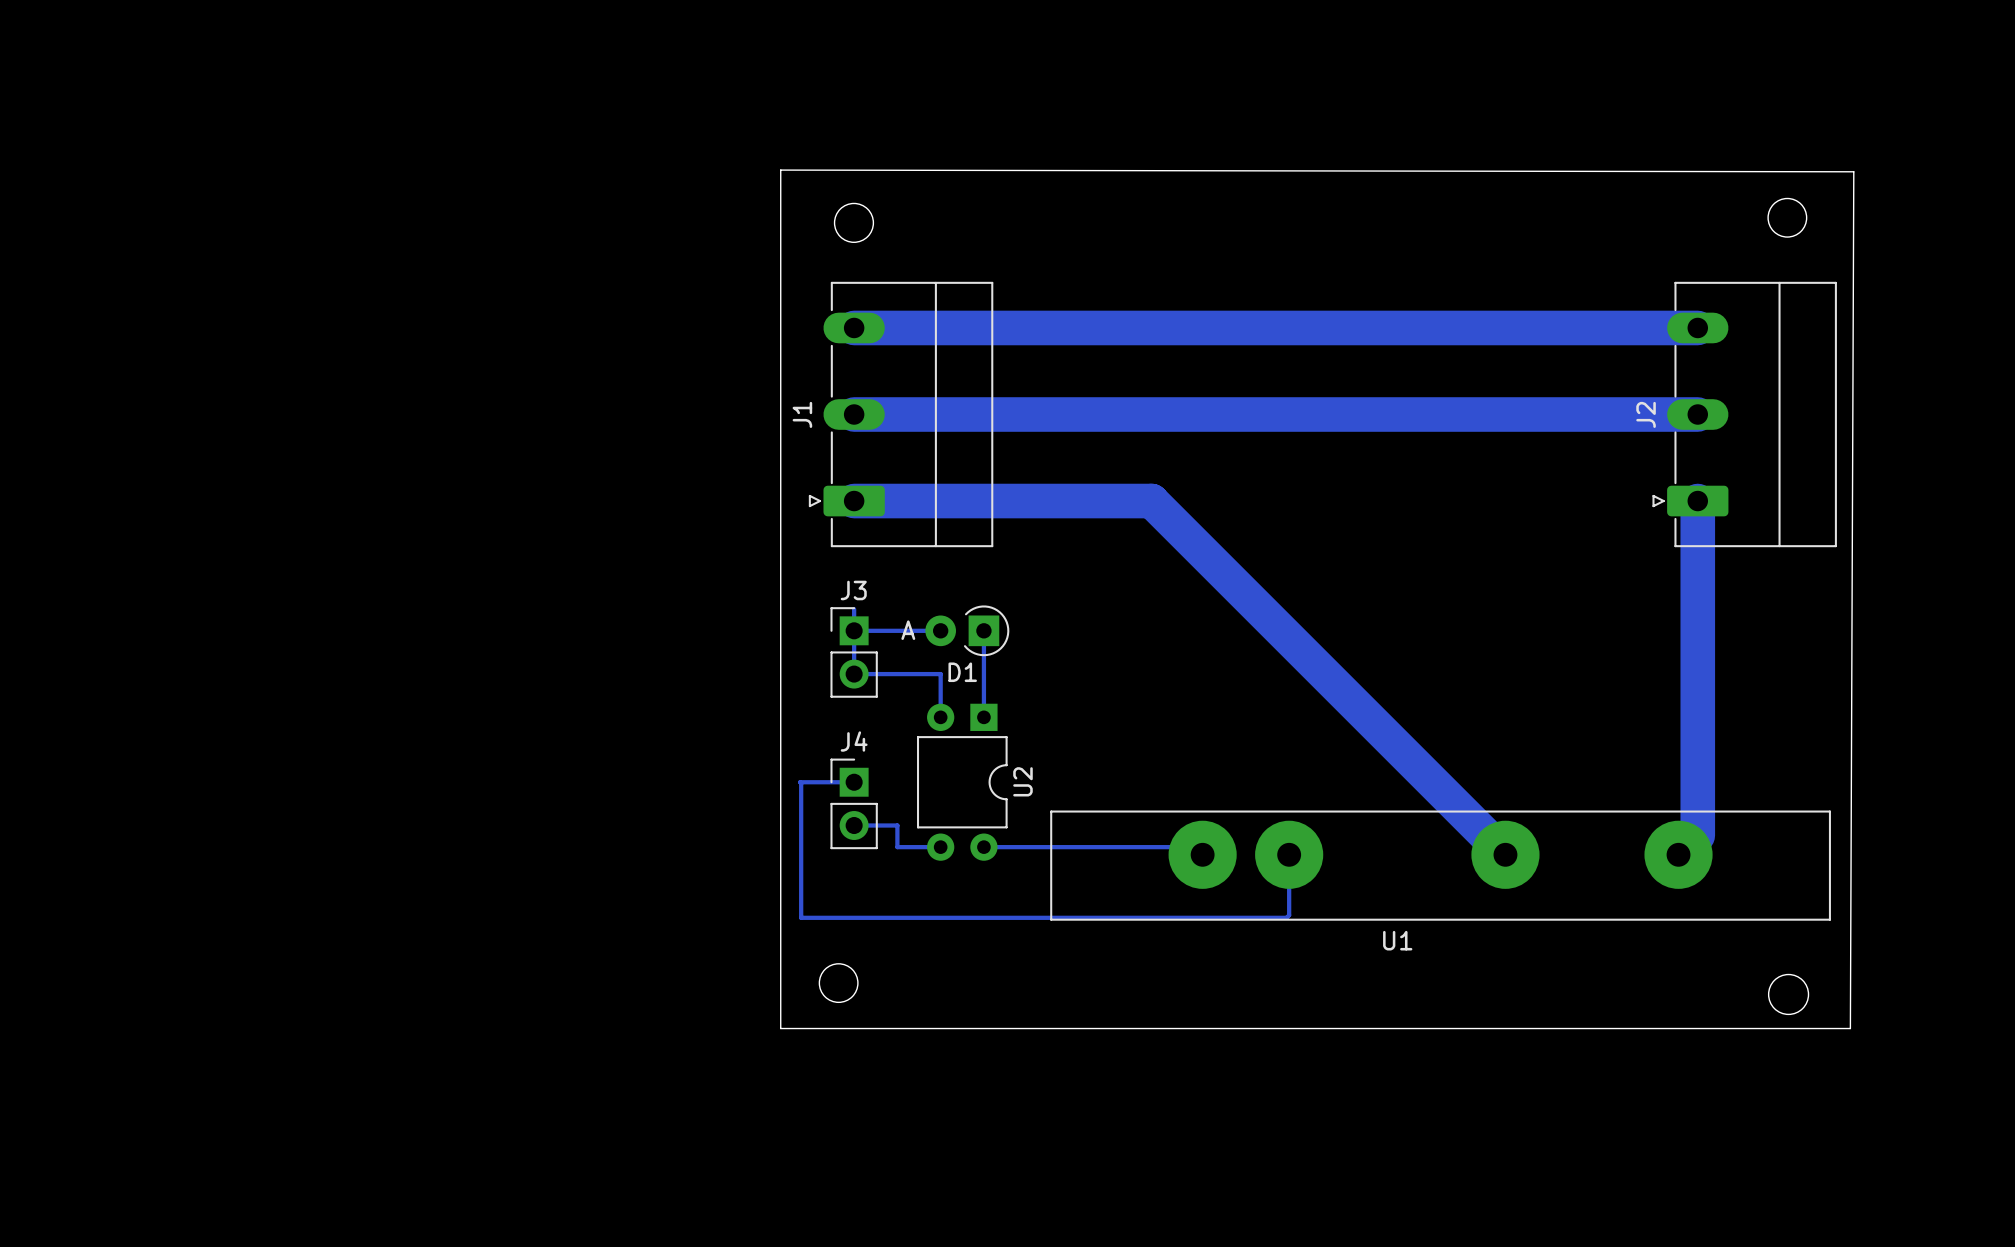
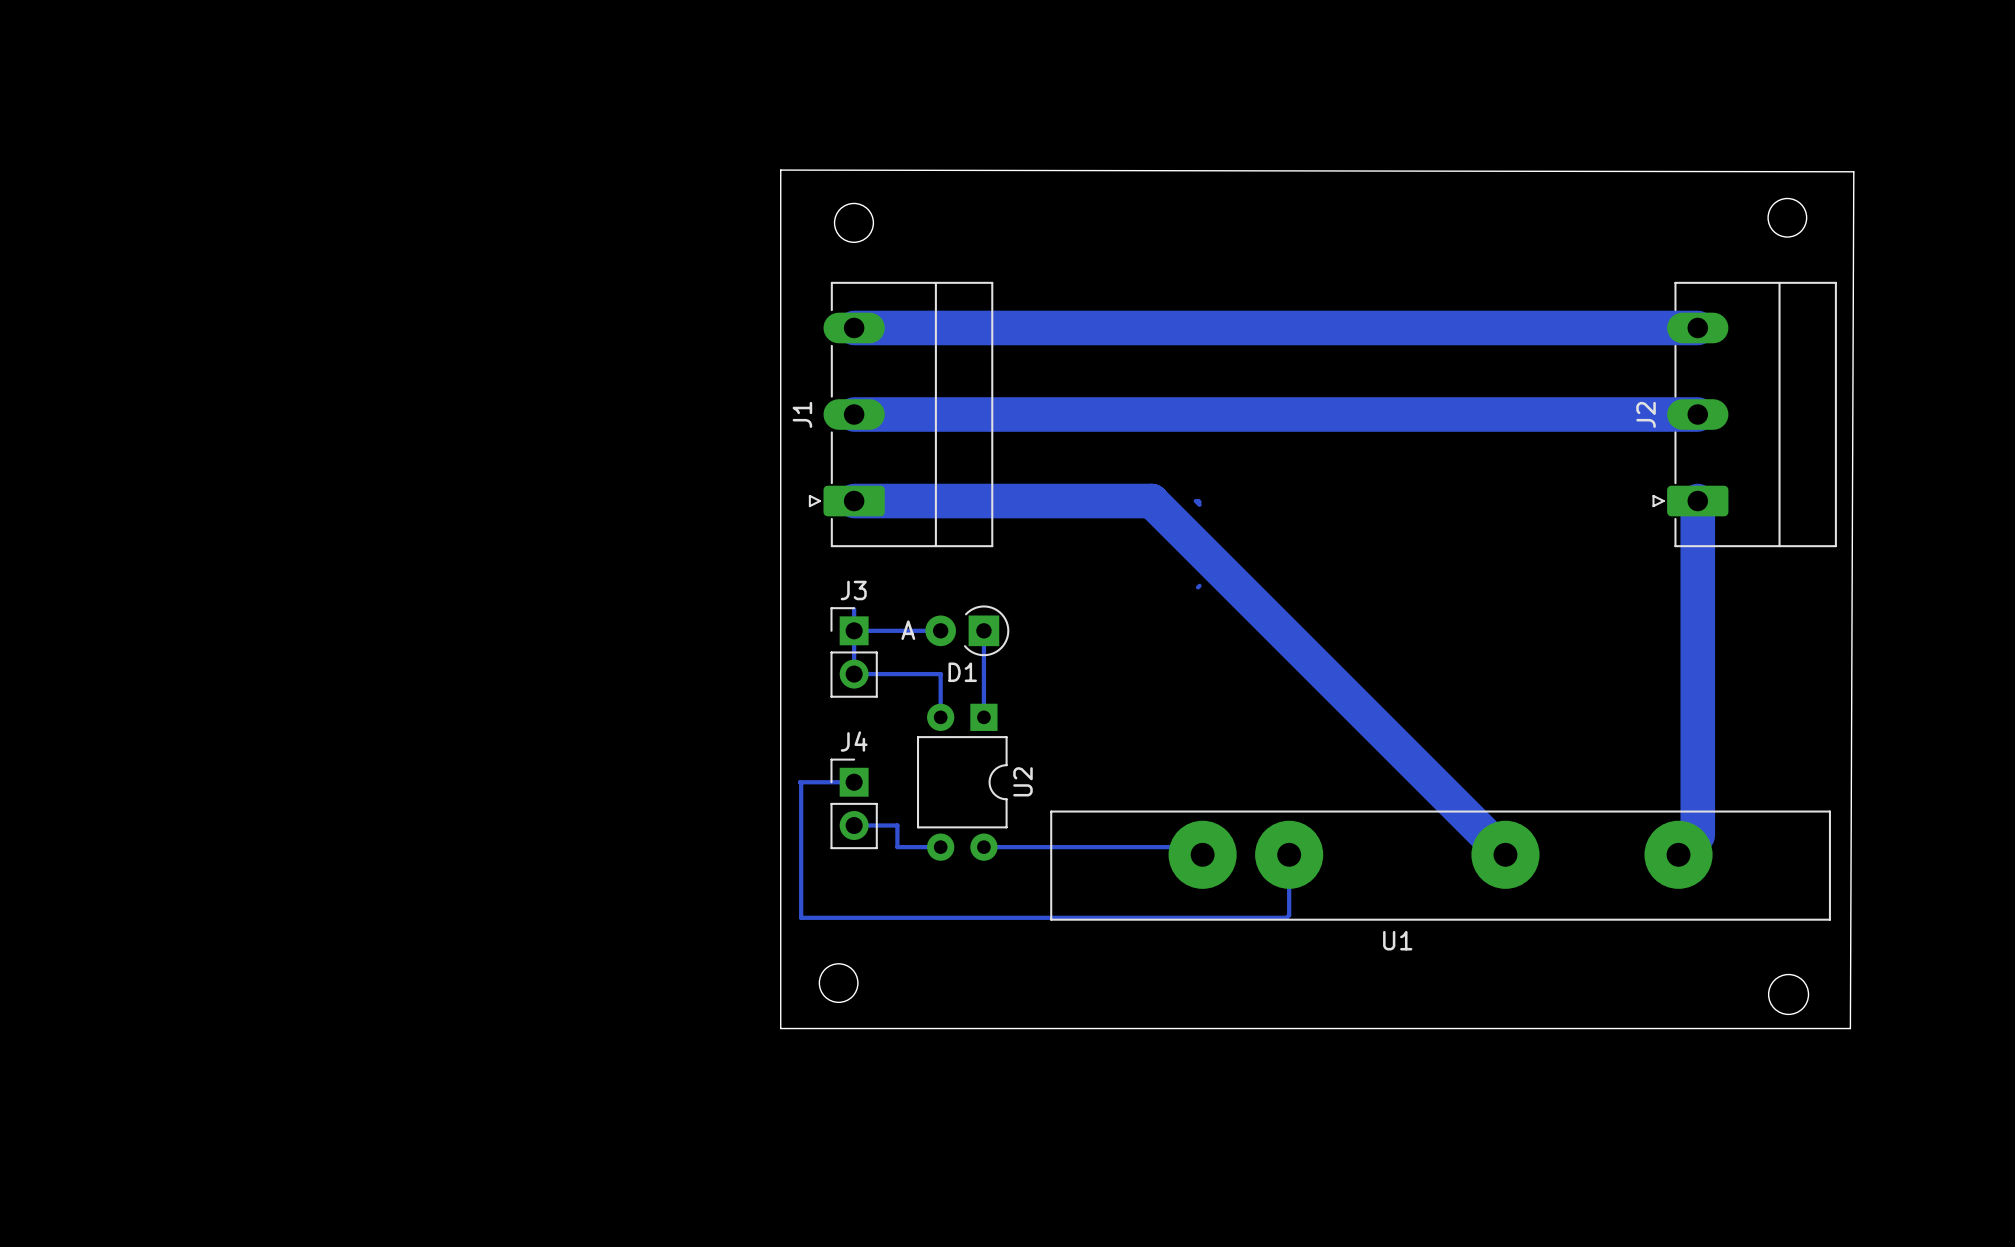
bottom track: none -> (1195, 501) (1199, 504)
bottom track: none -> (1198, 501) (1199, 502)
bottom track: none -> (1199, 585) (1198, 587)

